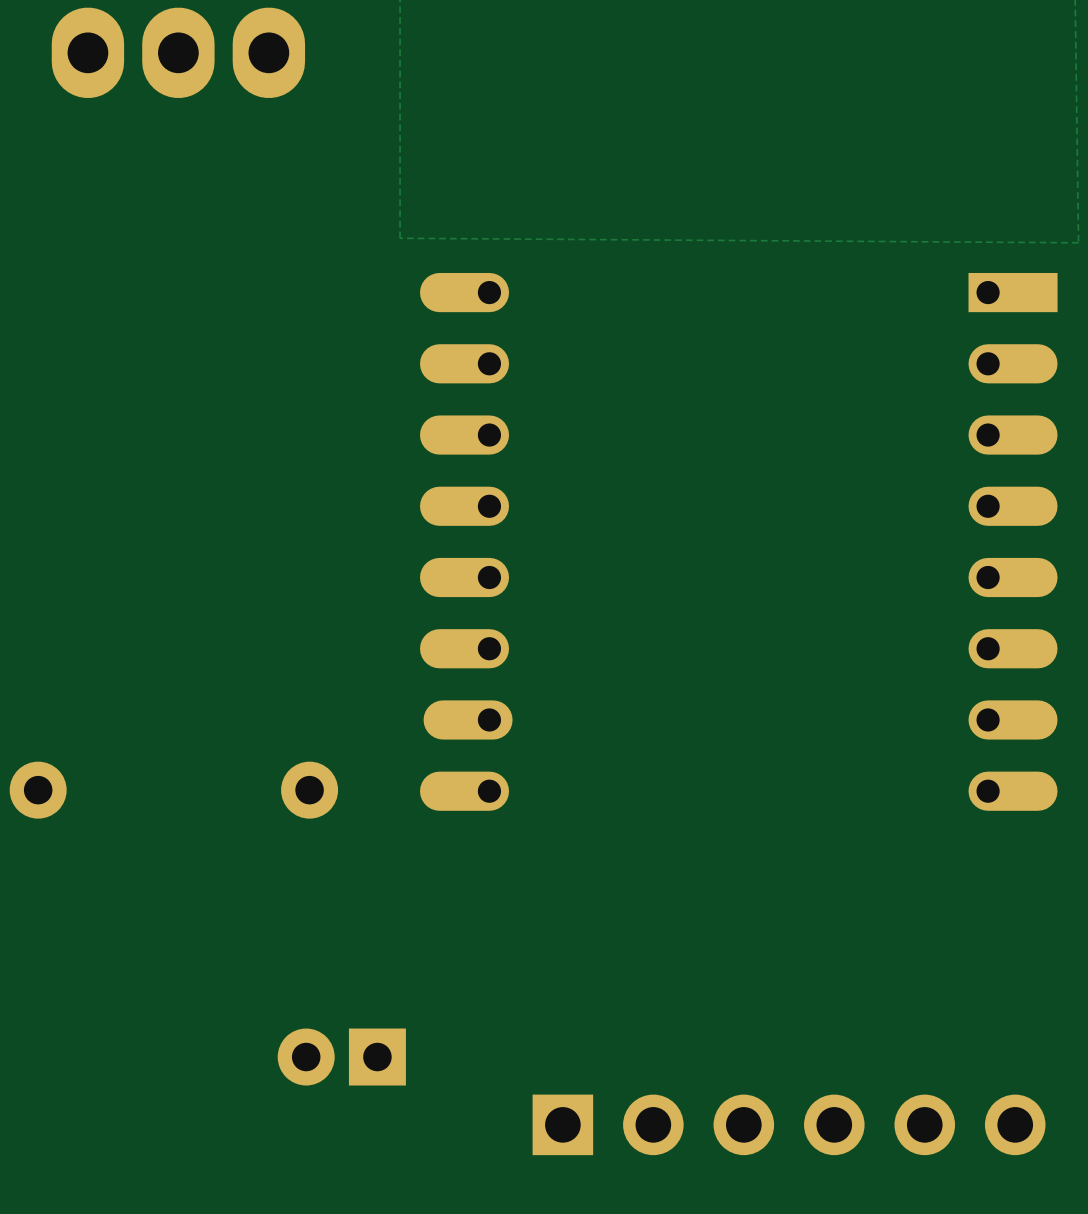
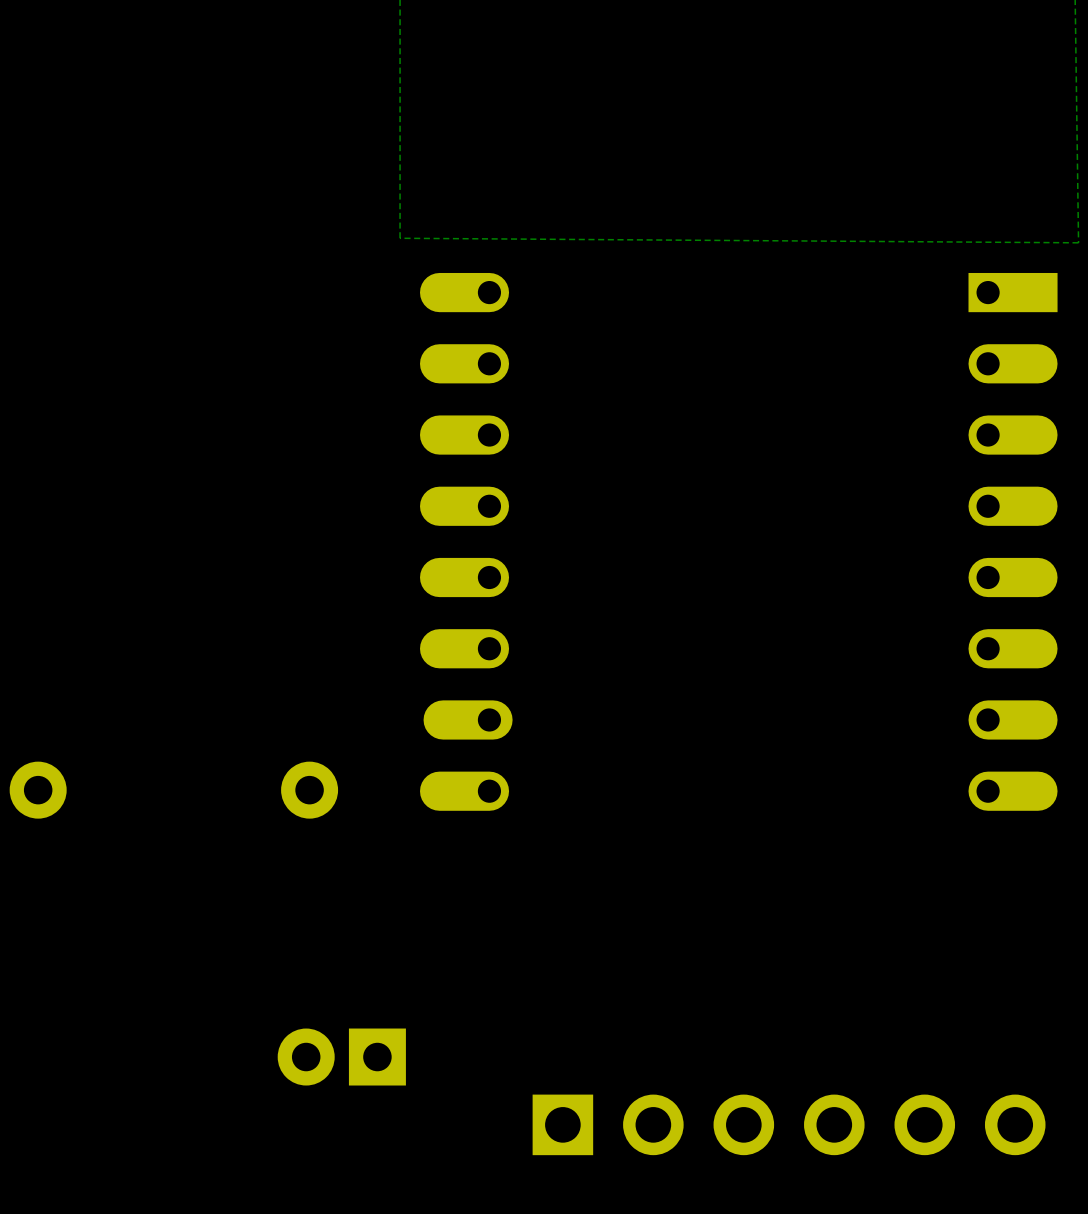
part: (178, 52) -> none

